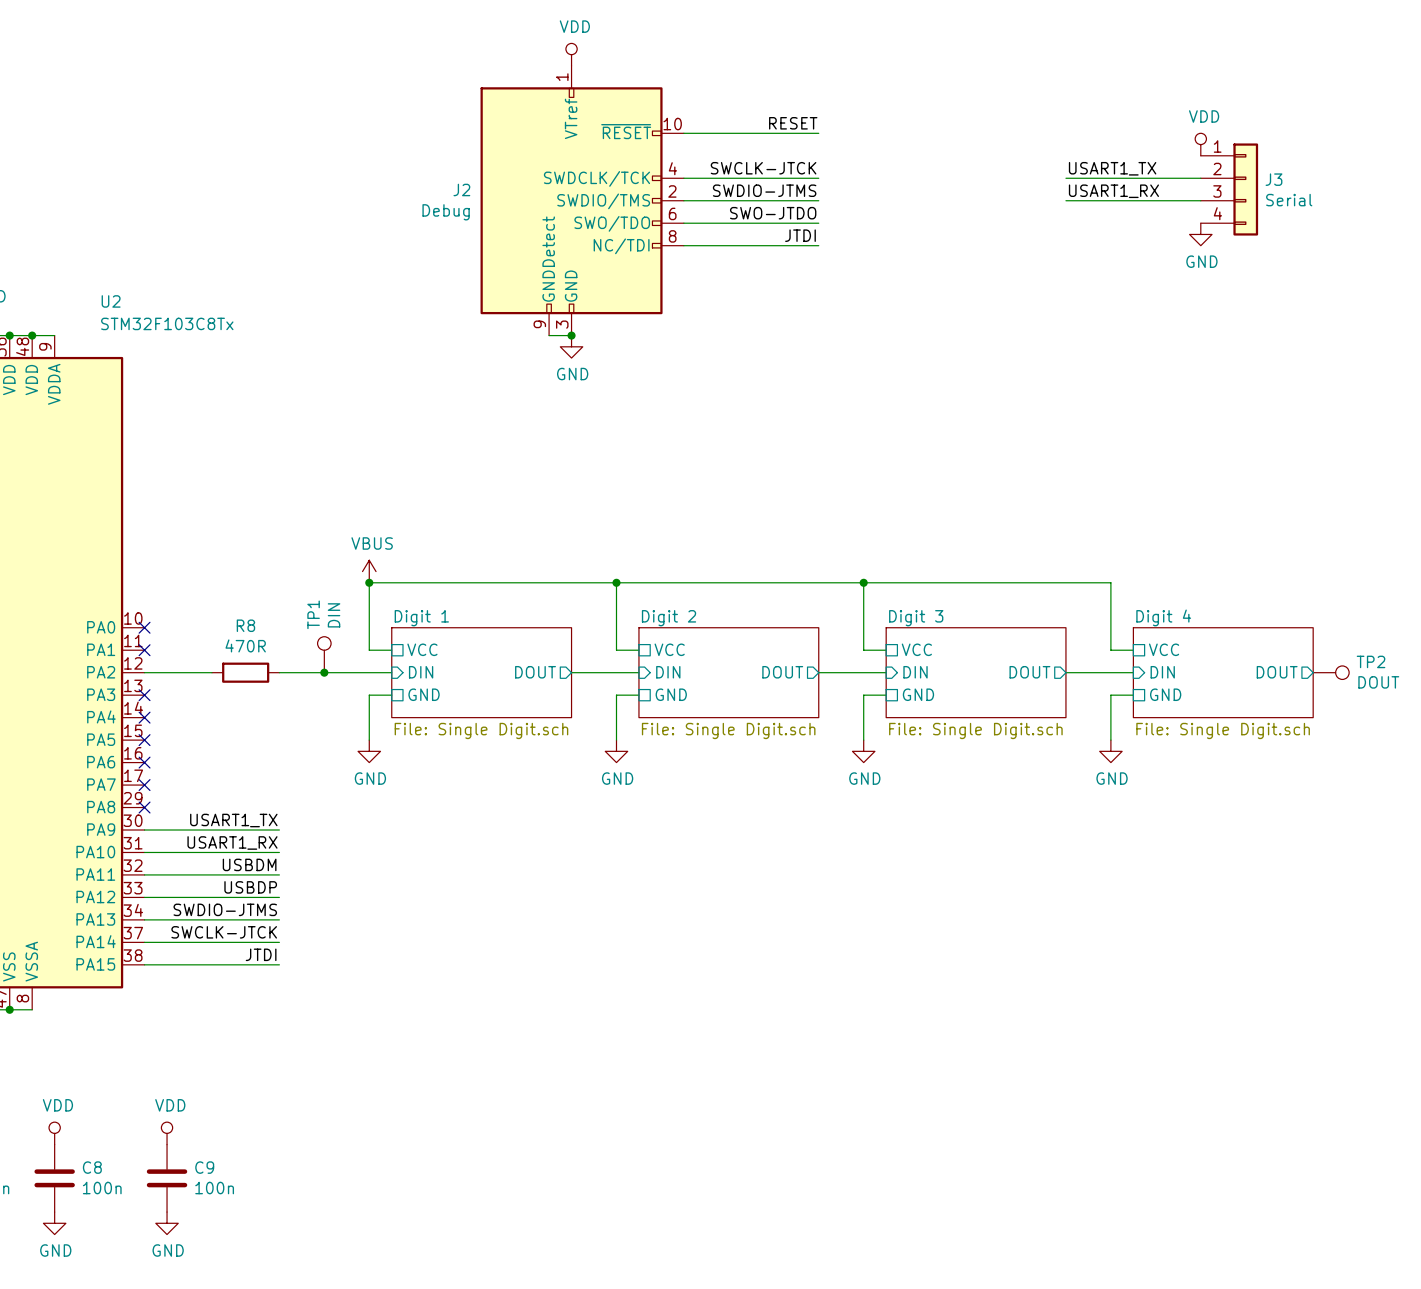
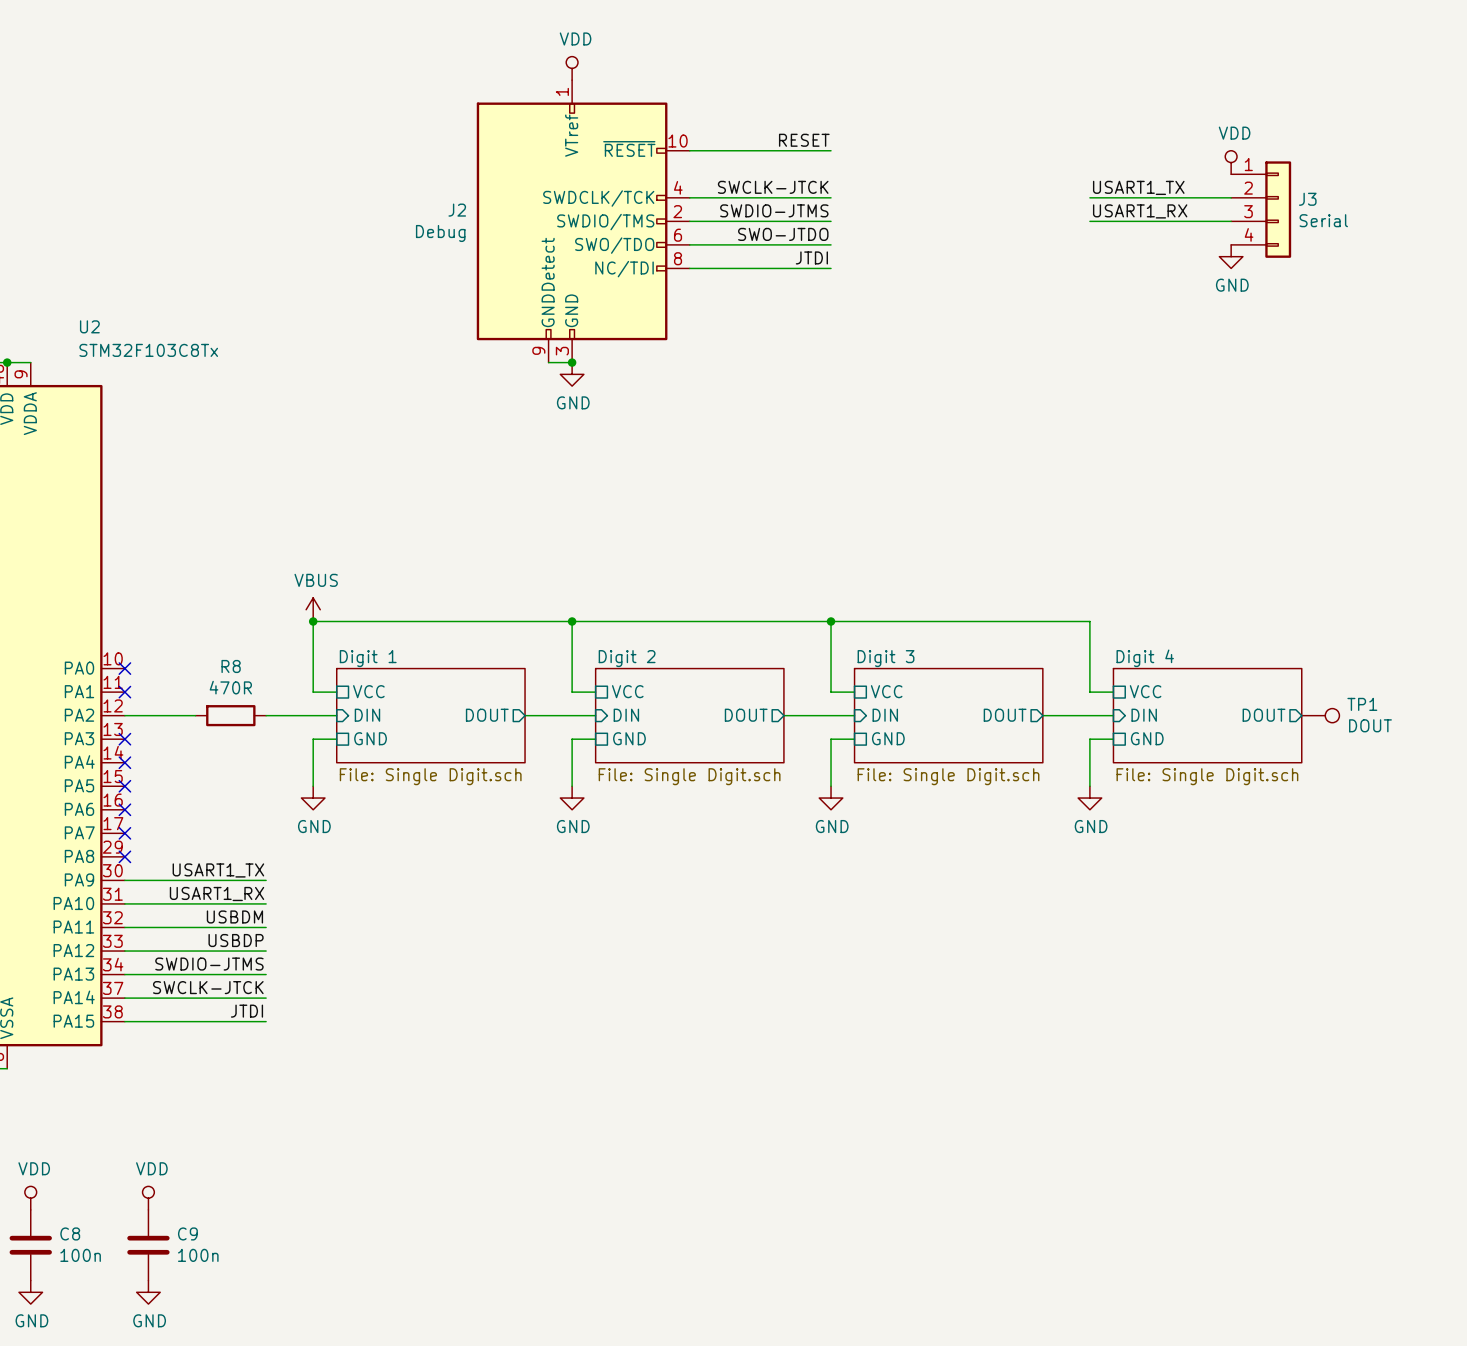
power symbol position: VBUS (369, 571) -> VBUS (313, 609)
junction: none -> (313, 621)
wire: (369, 582) (369, 650) (391, 650) -> (360, 621) (313, 621) (313, 692) (336, 692)
junction: (369, 582) -> none
wire: (616, 582) (616, 650) (638, 650) -> (572, 621) (572, 692) (595, 692)
junction position: (616, 582) -> (572, 621)
wire: (863, 582) (863, 650) (886, 650) -> (831, 621) (831, 692) (854, 692)
junction position: (863, 582) -> (831, 621)
wire: (1065, 582) (1110, 582) (1110, 650) (1133, 650) -> (1089, 621) (1089, 692) (1113, 692)
TP1 value: DIN (334, 615) -> DOUT (1370, 725)
TP1 rotation: 0° (324, 643) -> 90° clockwise (1332, 715)
sheet pin position: VCC (422, 649) -> VCC (368, 691)
sheet pin position: VCC (669, 649) -> VCC (627, 691)
sheet pin position: VCC (916, 649) -> VCC (886, 691)
sheet pin position: VCC (1164, 649) -> VCC (1145, 691)
TP1 position: (324, 654) -> (1320, 715)
junction: (324, 672) -> none
wire: (346, 672) (391, 672) -> none
sheet pin position: DIN (421, 672) -> DIN (367, 715)
sheet Digit 1 position: (481, 672) -> (430, 715)
sheet pin position: DOUT (535, 672) -> DOUT (487, 715)
wire: (594, 672) (638, 672) -> (525, 715) (572, 715)
sheet pin position: DIN (668, 672) -> DIN (626, 715)
sheet Digit 2 position: (728, 672) -> (689, 715)
sheet pin position: DOUT (782, 672) -> DOUT (746, 715)
wire: (841, 672) (886, 672) -> (783, 715) (831, 715)
sheet pin position: DIN (915, 672) -> DIN (885, 715)
sheet Digit 3 position: (976, 672) -> (948, 715)
sheet pin position: DOUT (1029, 672) -> DOUT (1005, 715)
wire: (1088, 672) (1133, 672) -> (1042, 715) (1089, 715)
sheet pin position: DIN (1162, 672) -> DIN (1144, 715)
sheet Digit 4 position: (1223, 672) -> (1207, 715)
sheet pin position: DOUT (1277, 672) -> DOUT (1264, 715)
TP2: DOUT (1331, 672) -> none
sheet pin position: GND (424, 694) -> GND (370, 738)
sheet pin position: GND (671, 694) -> GND (629, 738)
sheet pin position: GND (918, 694) -> GND (888, 738)
sheet pin position: GND (1165, 694) -> GND (1147, 738)
wire: (391, 695) (369, 695) (369, 740) -> (336, 739) (313, 739) (313, 786)
wire: (638, 695) (616, 695) (616, 740) -> (595, 739) (572, 739) (572, 786)
wire: (886, 695) (863, 695) (863, 740) -> (854, 739) (831, 739) (831, 786)
wire: (1133, 695) (1110, 695) (1110, 740) -> (1113, 739) (1089, 739) (1089, 786)
power symbol position: GND (369, 751) -> GND (313, 798)
power symbol position: GND (616, 751) -> GND (572, 798)
power symbol position: GND (863, 751) -> GND (831, 798)
power symbol position: GND (1110, 751) -> GND (1089, 798)

